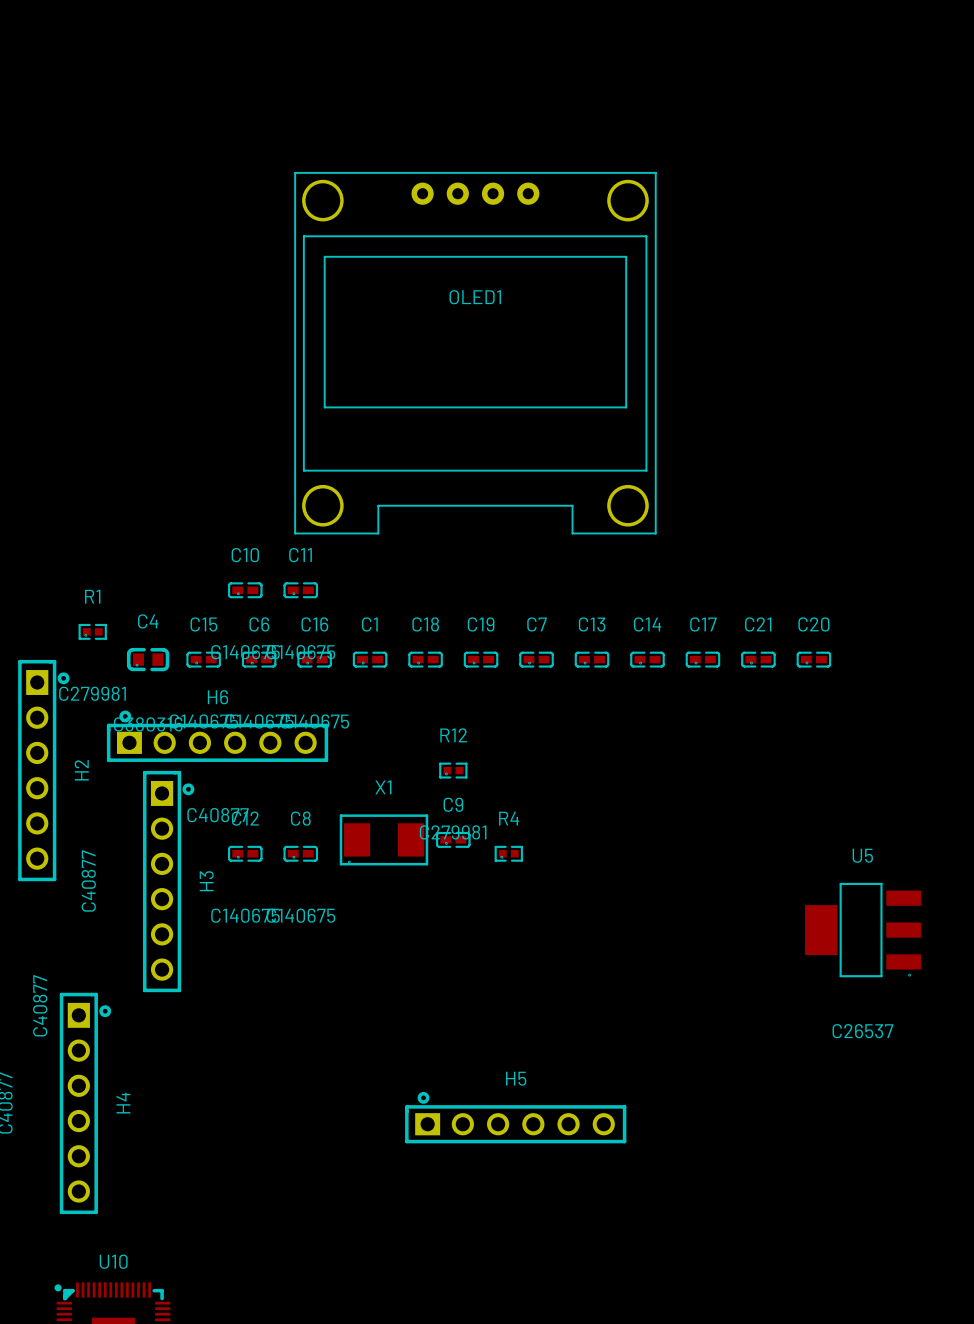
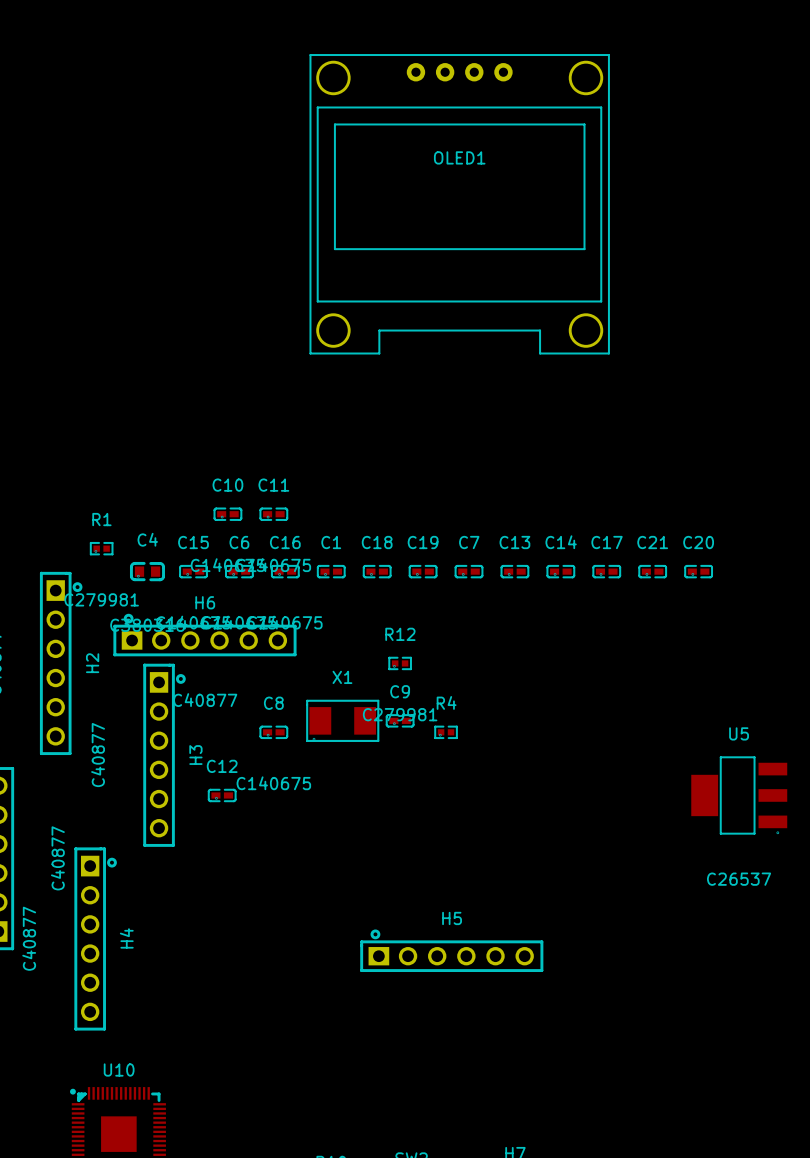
OLED1 position: (475, 353) -> (459, 204)
C12 position: (245, 853) -> (222, 795)
C12 text: C140675 (245, 915) -> none

